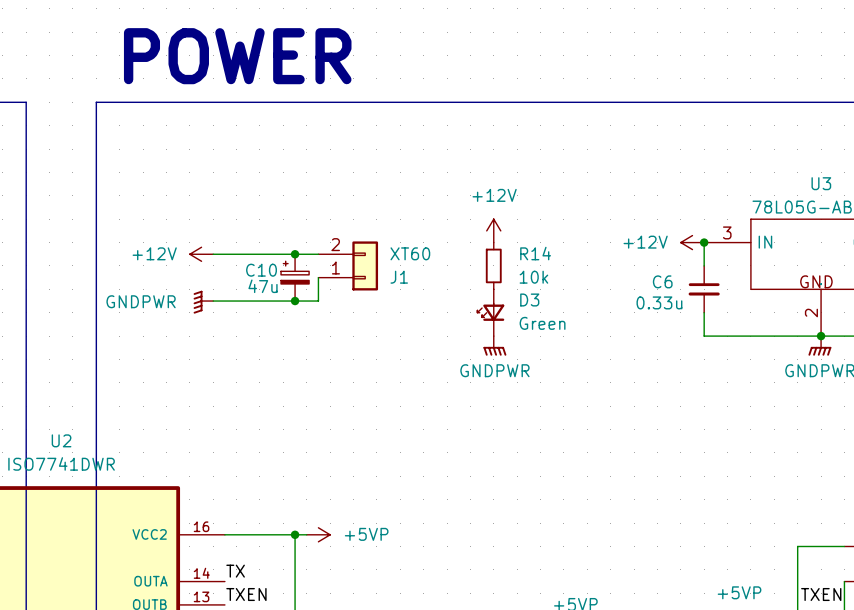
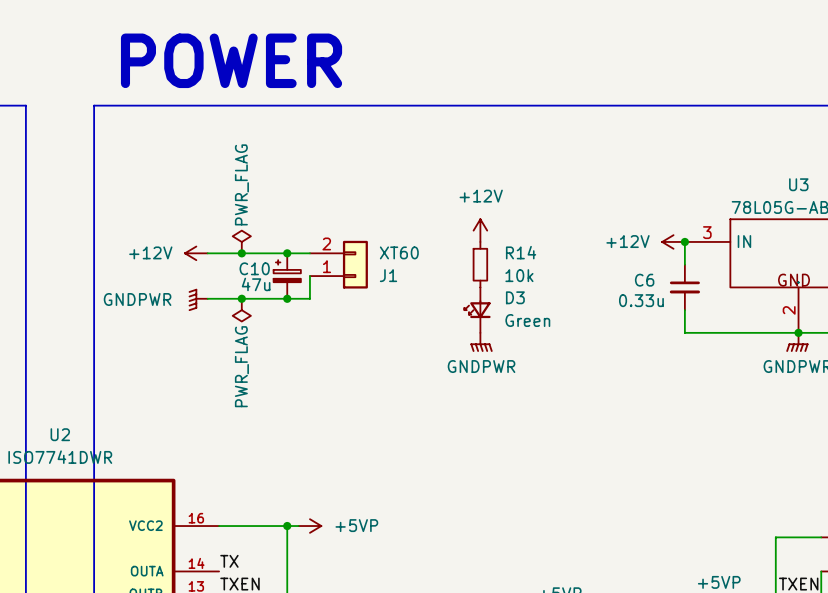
power symbol: none -> PWR_FLAG (241, 241)
junction: none -> (241, 253)
junction: none -> (241, 298)
power symbol: none -> PWR_FLAG (241, 310)

